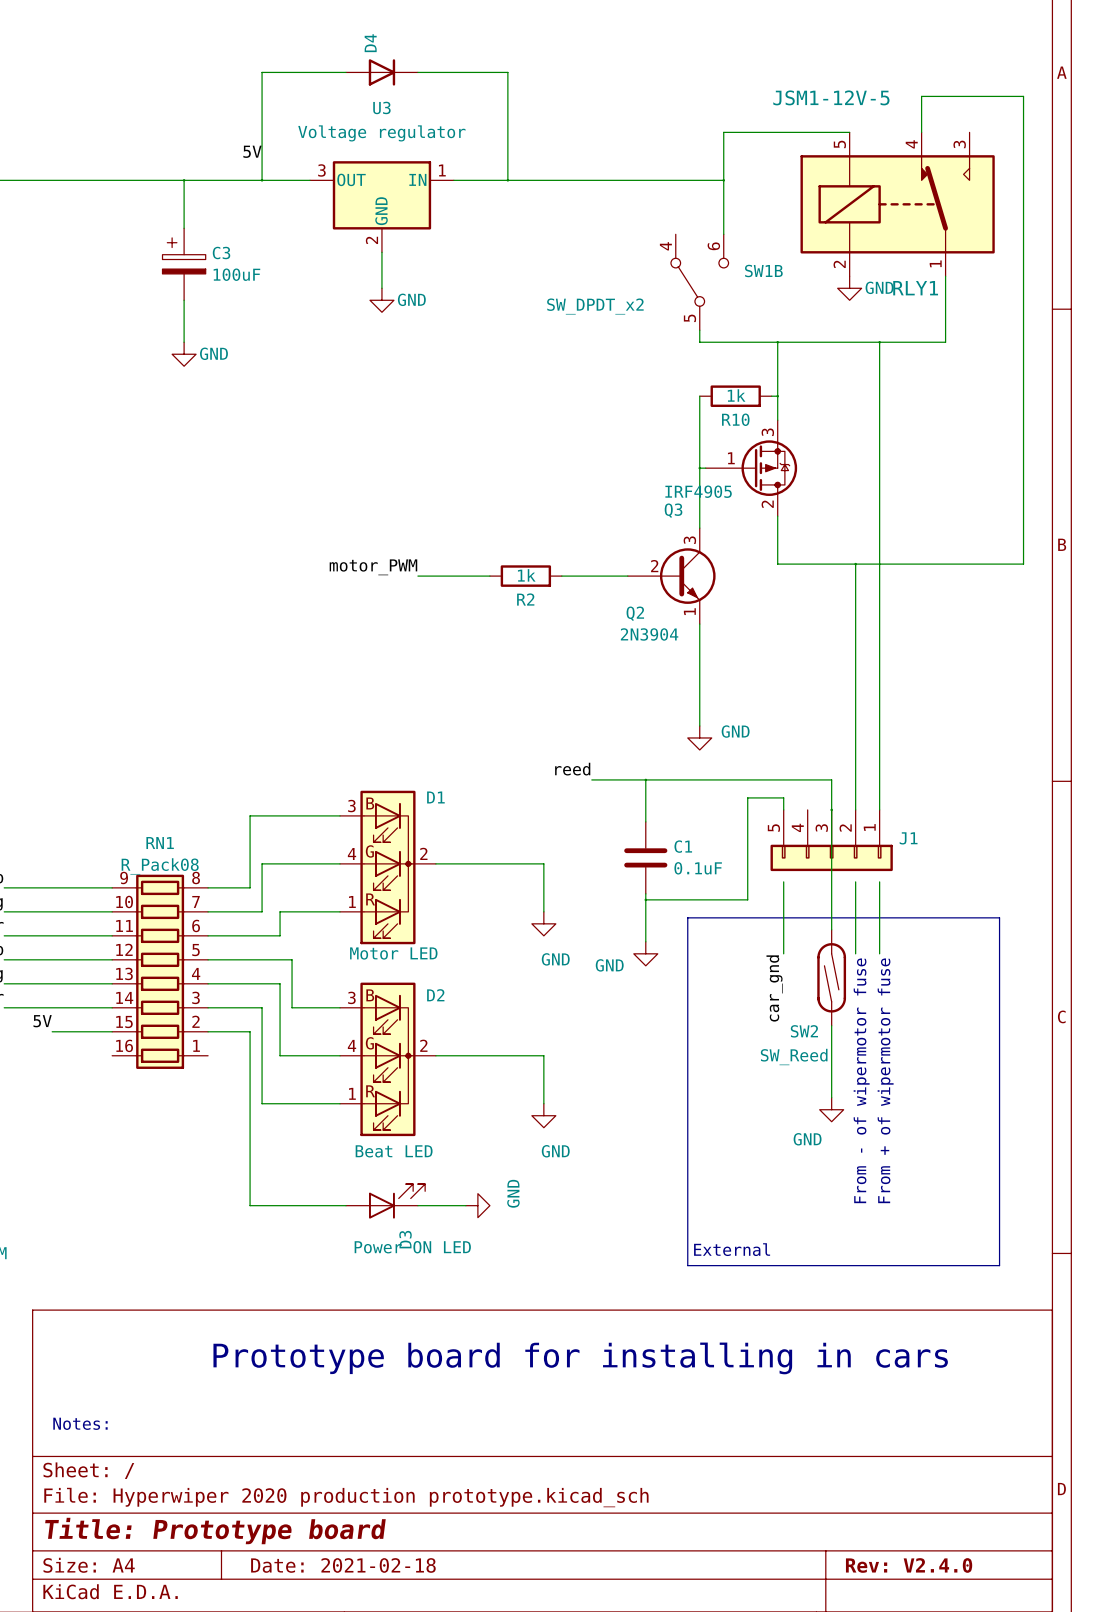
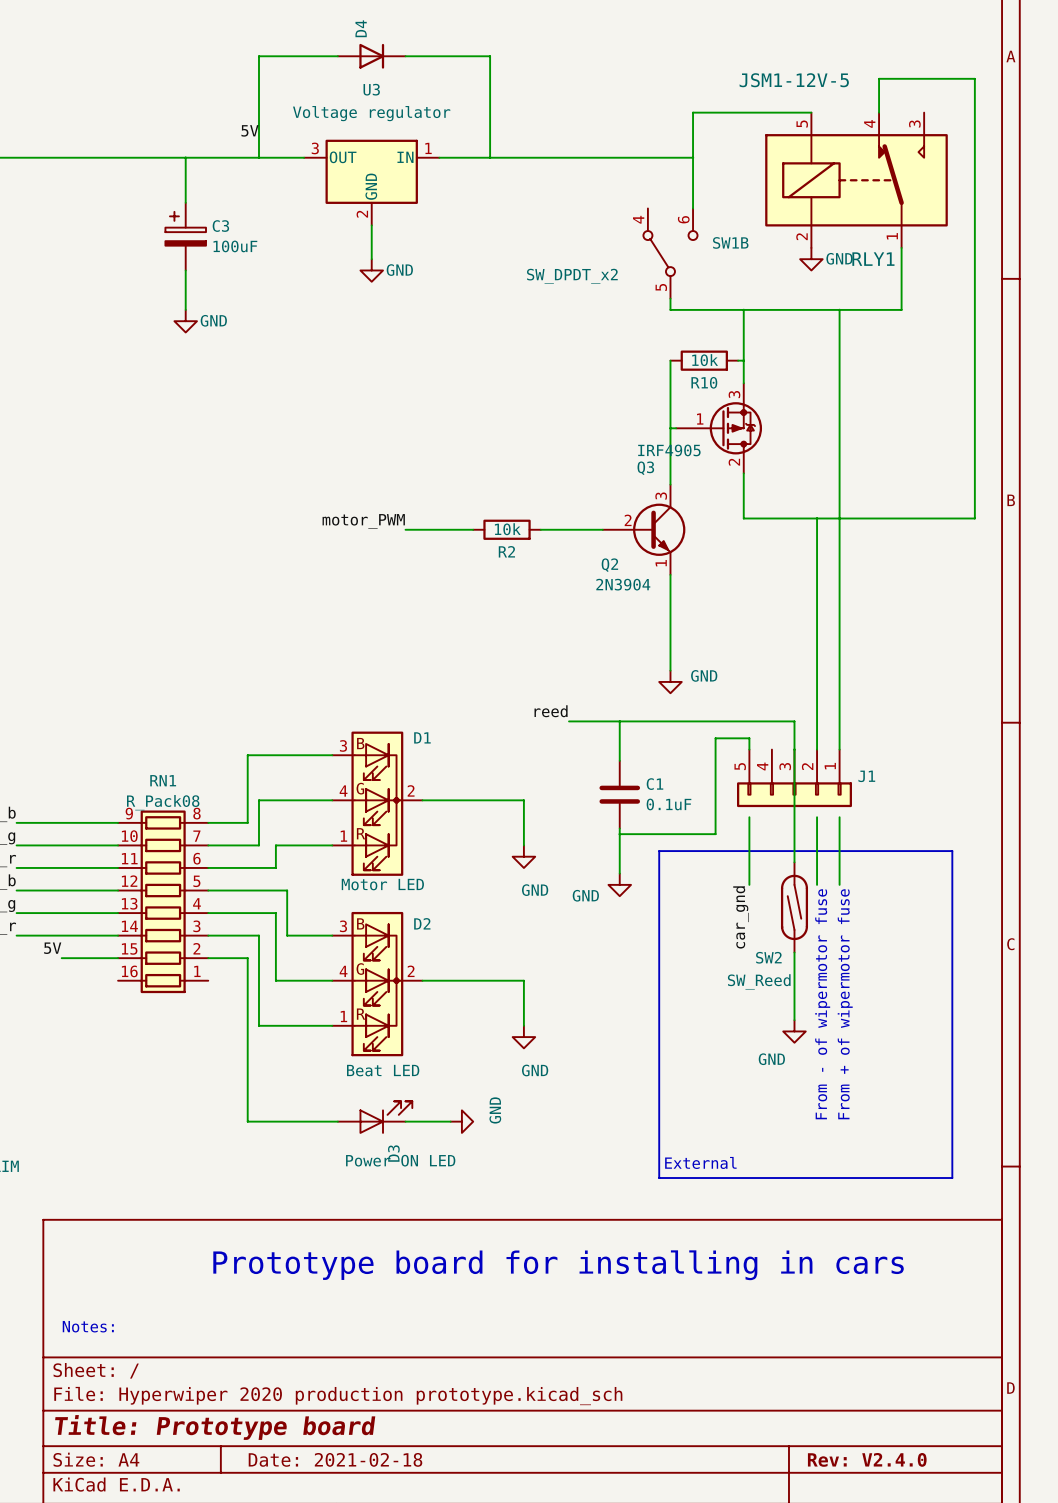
R10 value: 1k (736, 395) -> 10k (705, 360)
R2 value: 1k (526, 575) -> 10k (507, 529)

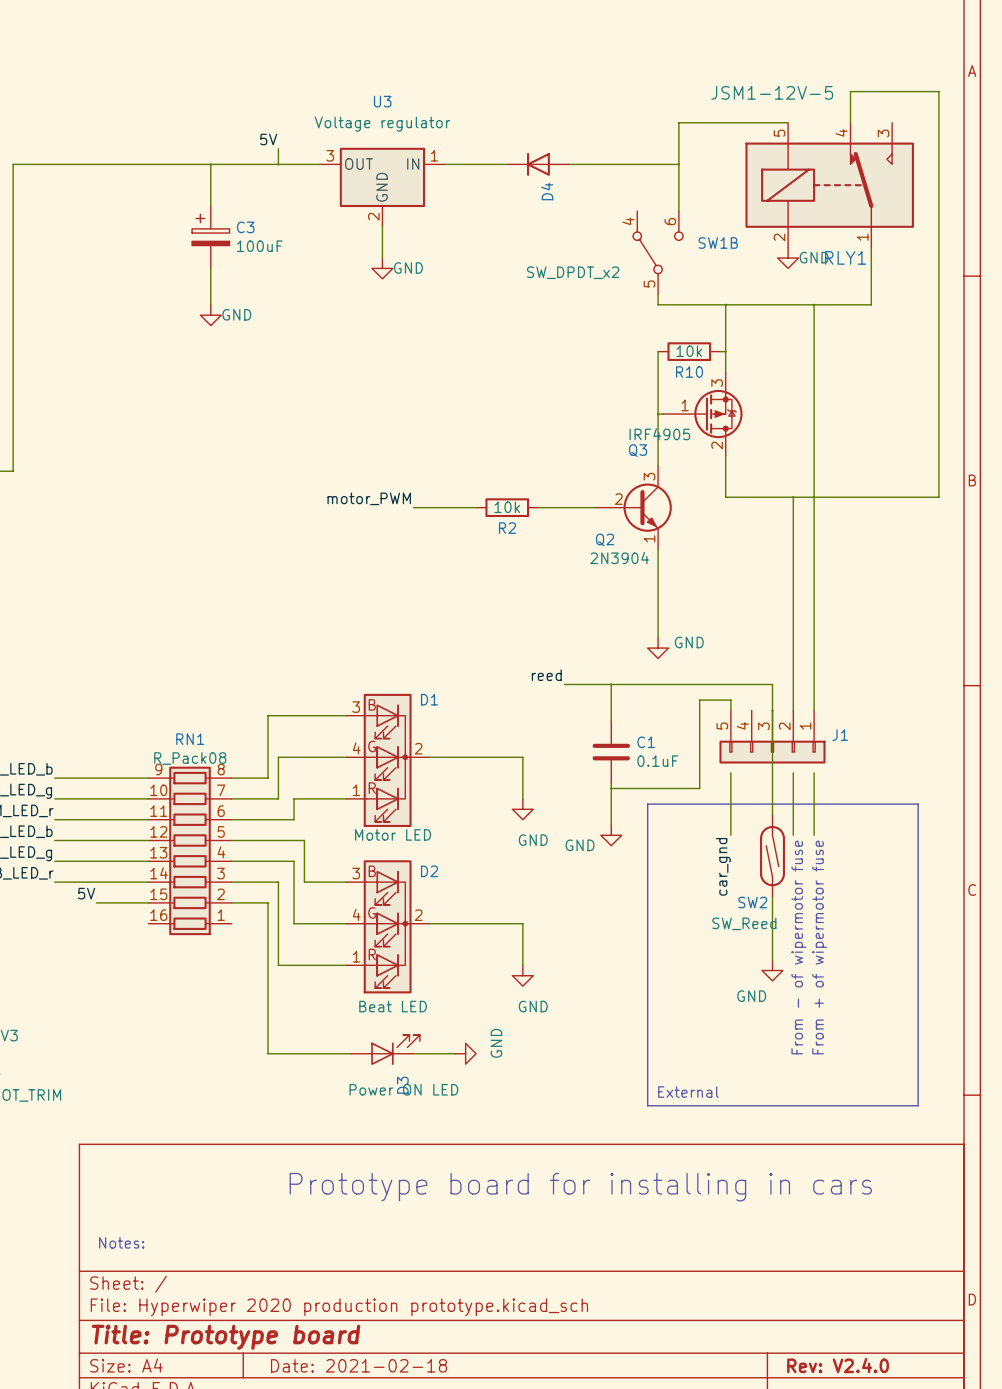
wire: (337, 56) (258, 56) (258, 140) -> none
D4 rotation: 0° (371, 56) -> 180° (538, 164)
D4 position: (371, 56) -> (538, 164)
wire: (405, 56) (490, 56) (490, 157) -> none

